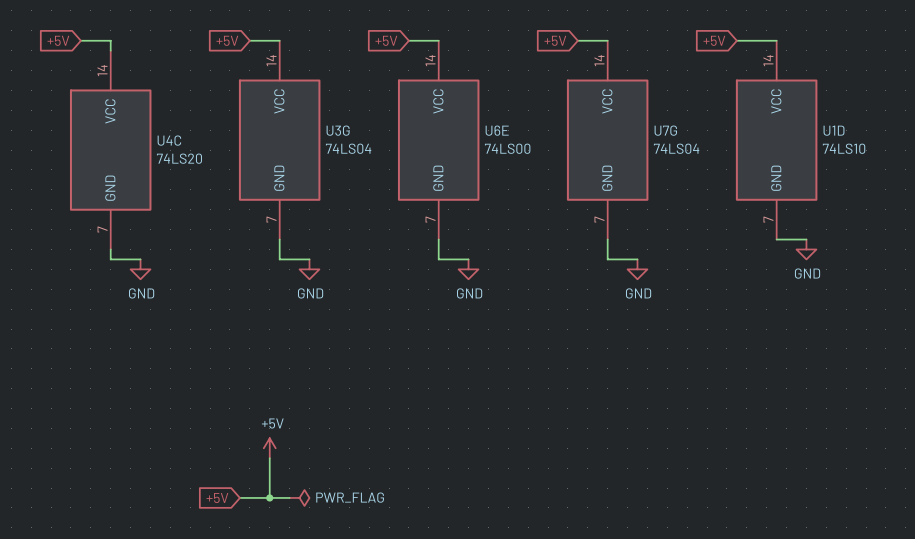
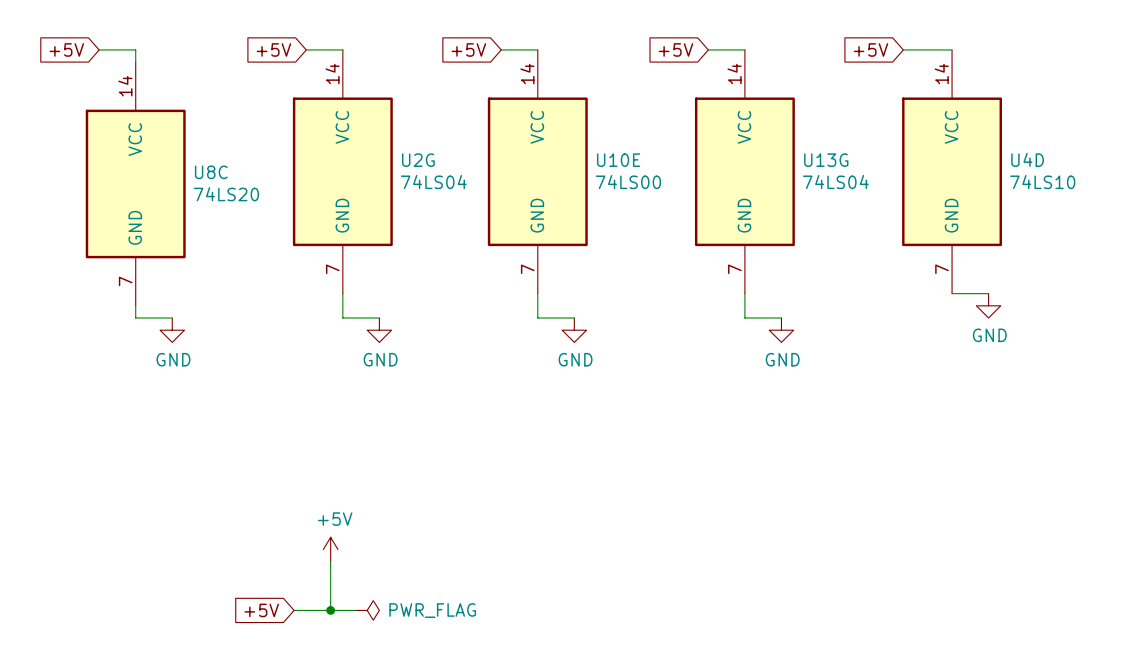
U3G name: U3G (338, 130) -> U2G (418, 160)
U6E name: U6E (497, 130) -> U10E (618, 160)
U7G name: U7G (665, 130) -> U13G (826, 160)
U1D name: U1D (834, 130) -> U4D (1027, 159)
U4C name: U4C (169, 140) -> U8C (211, 172)

